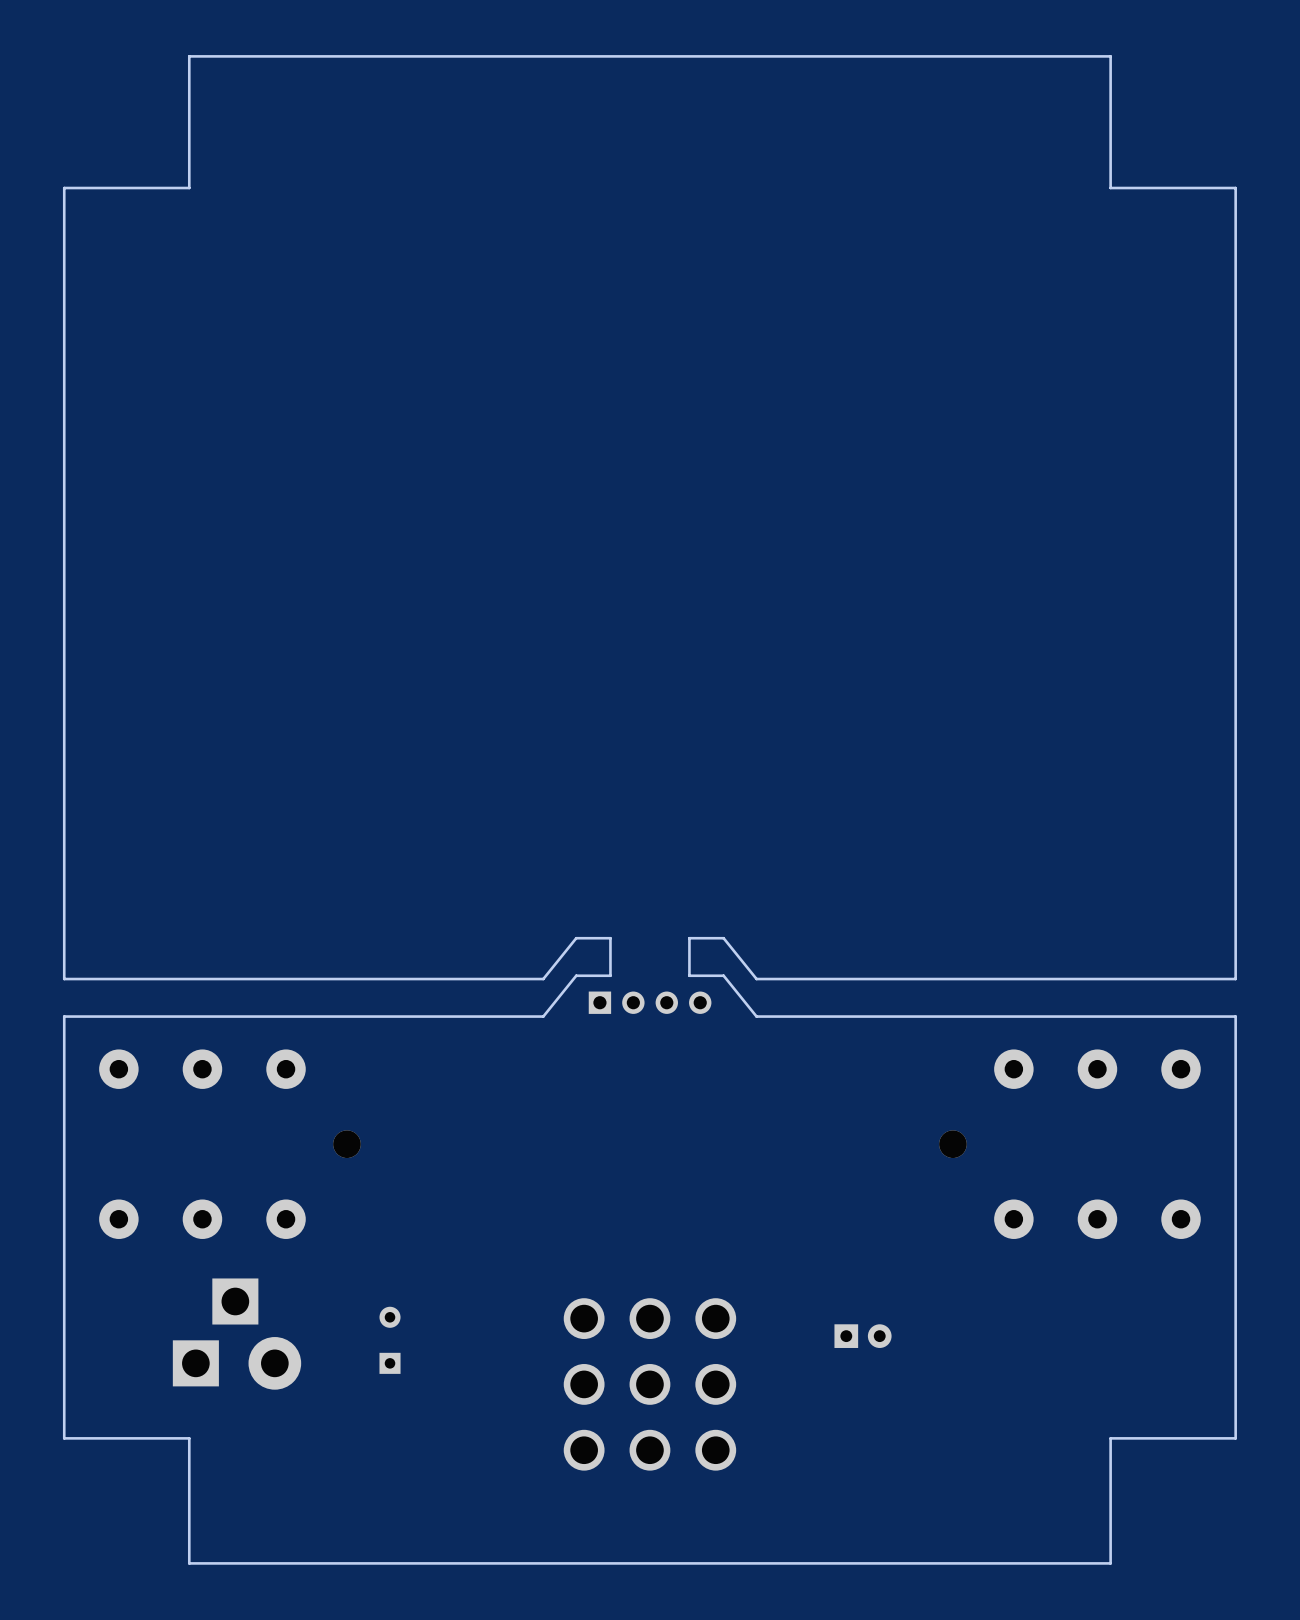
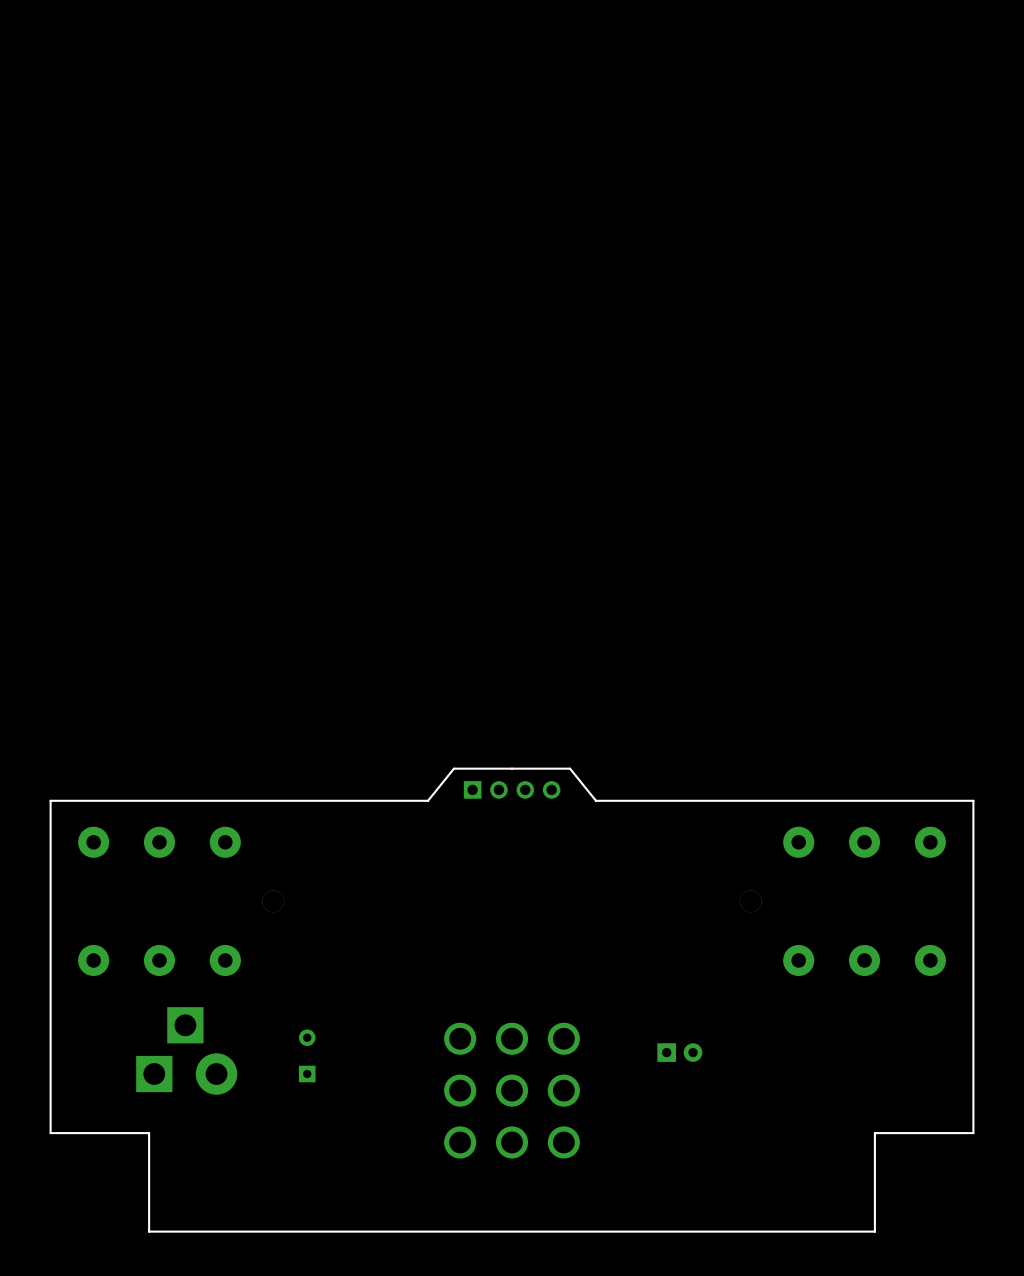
board edge: (689, 975) (689, 938) (723, 938) (756, 979) (1235, 979) (1235, 188) (1110, 188) (1110, 56) (189, 56) (189, 188) (64, 188) (64, 979) (543, 979) (576, 938) (610, 938) (610, 975) -> (543, 768) (480, 768)

